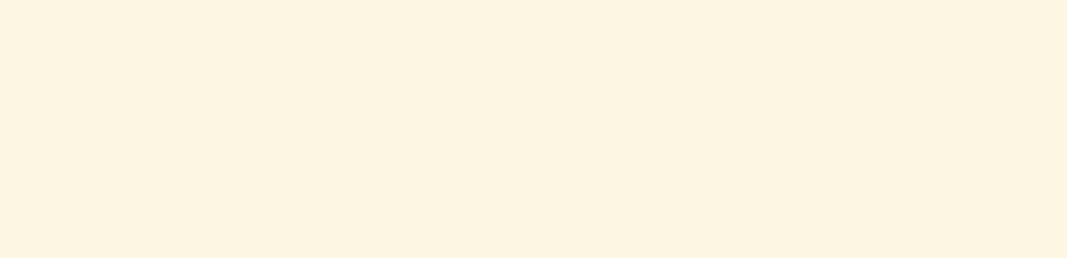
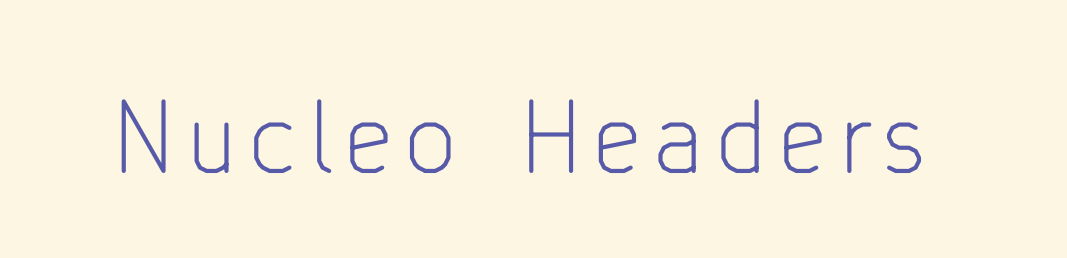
text: none -> Nucleo Headers (521, 136)

